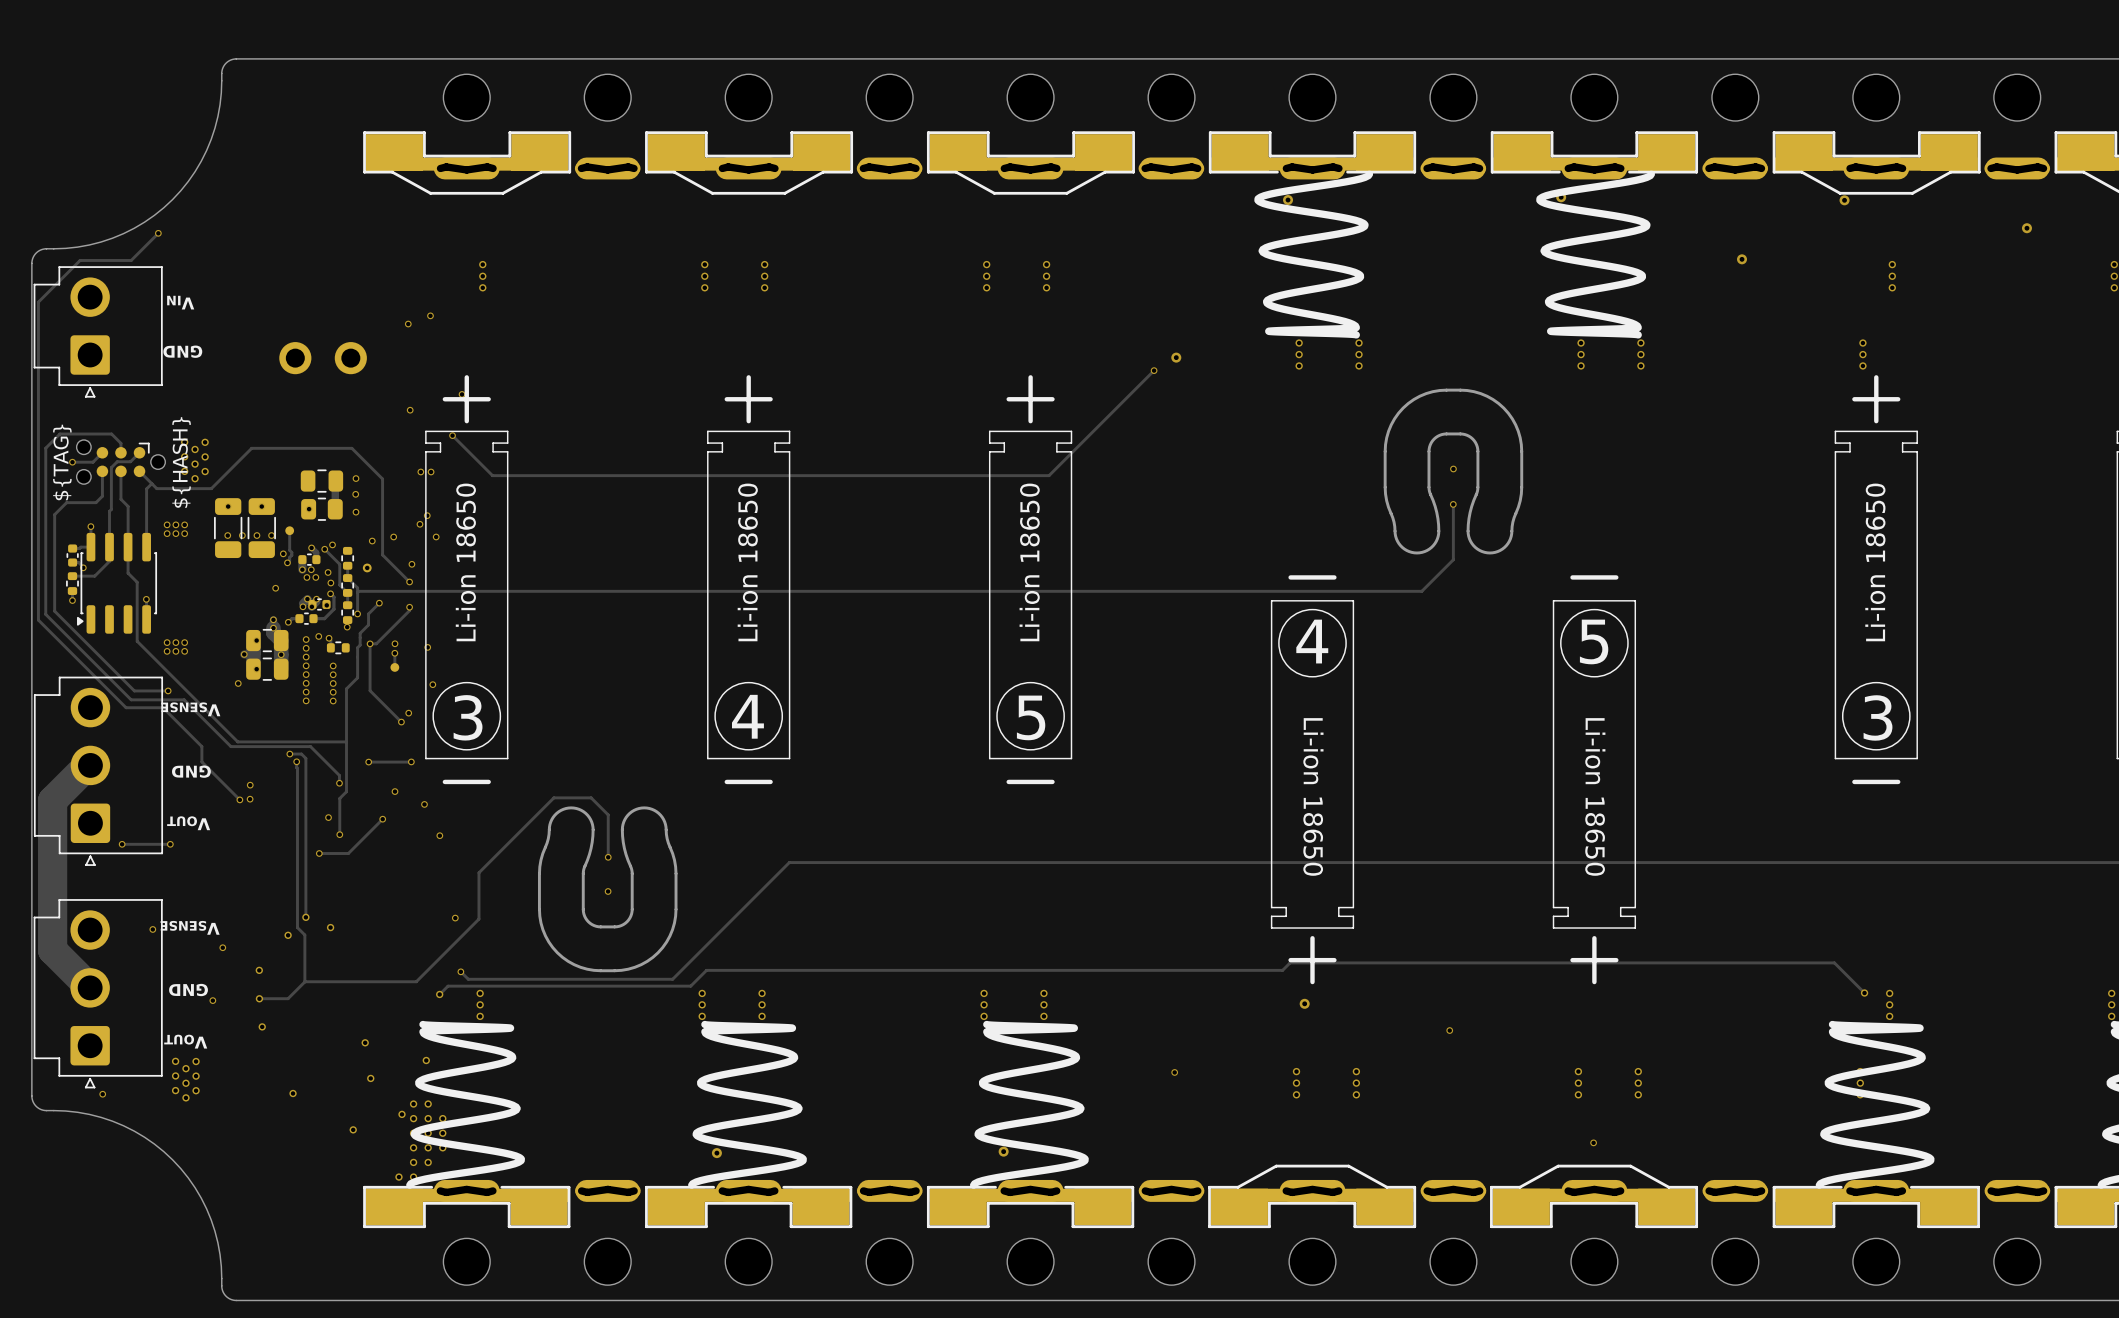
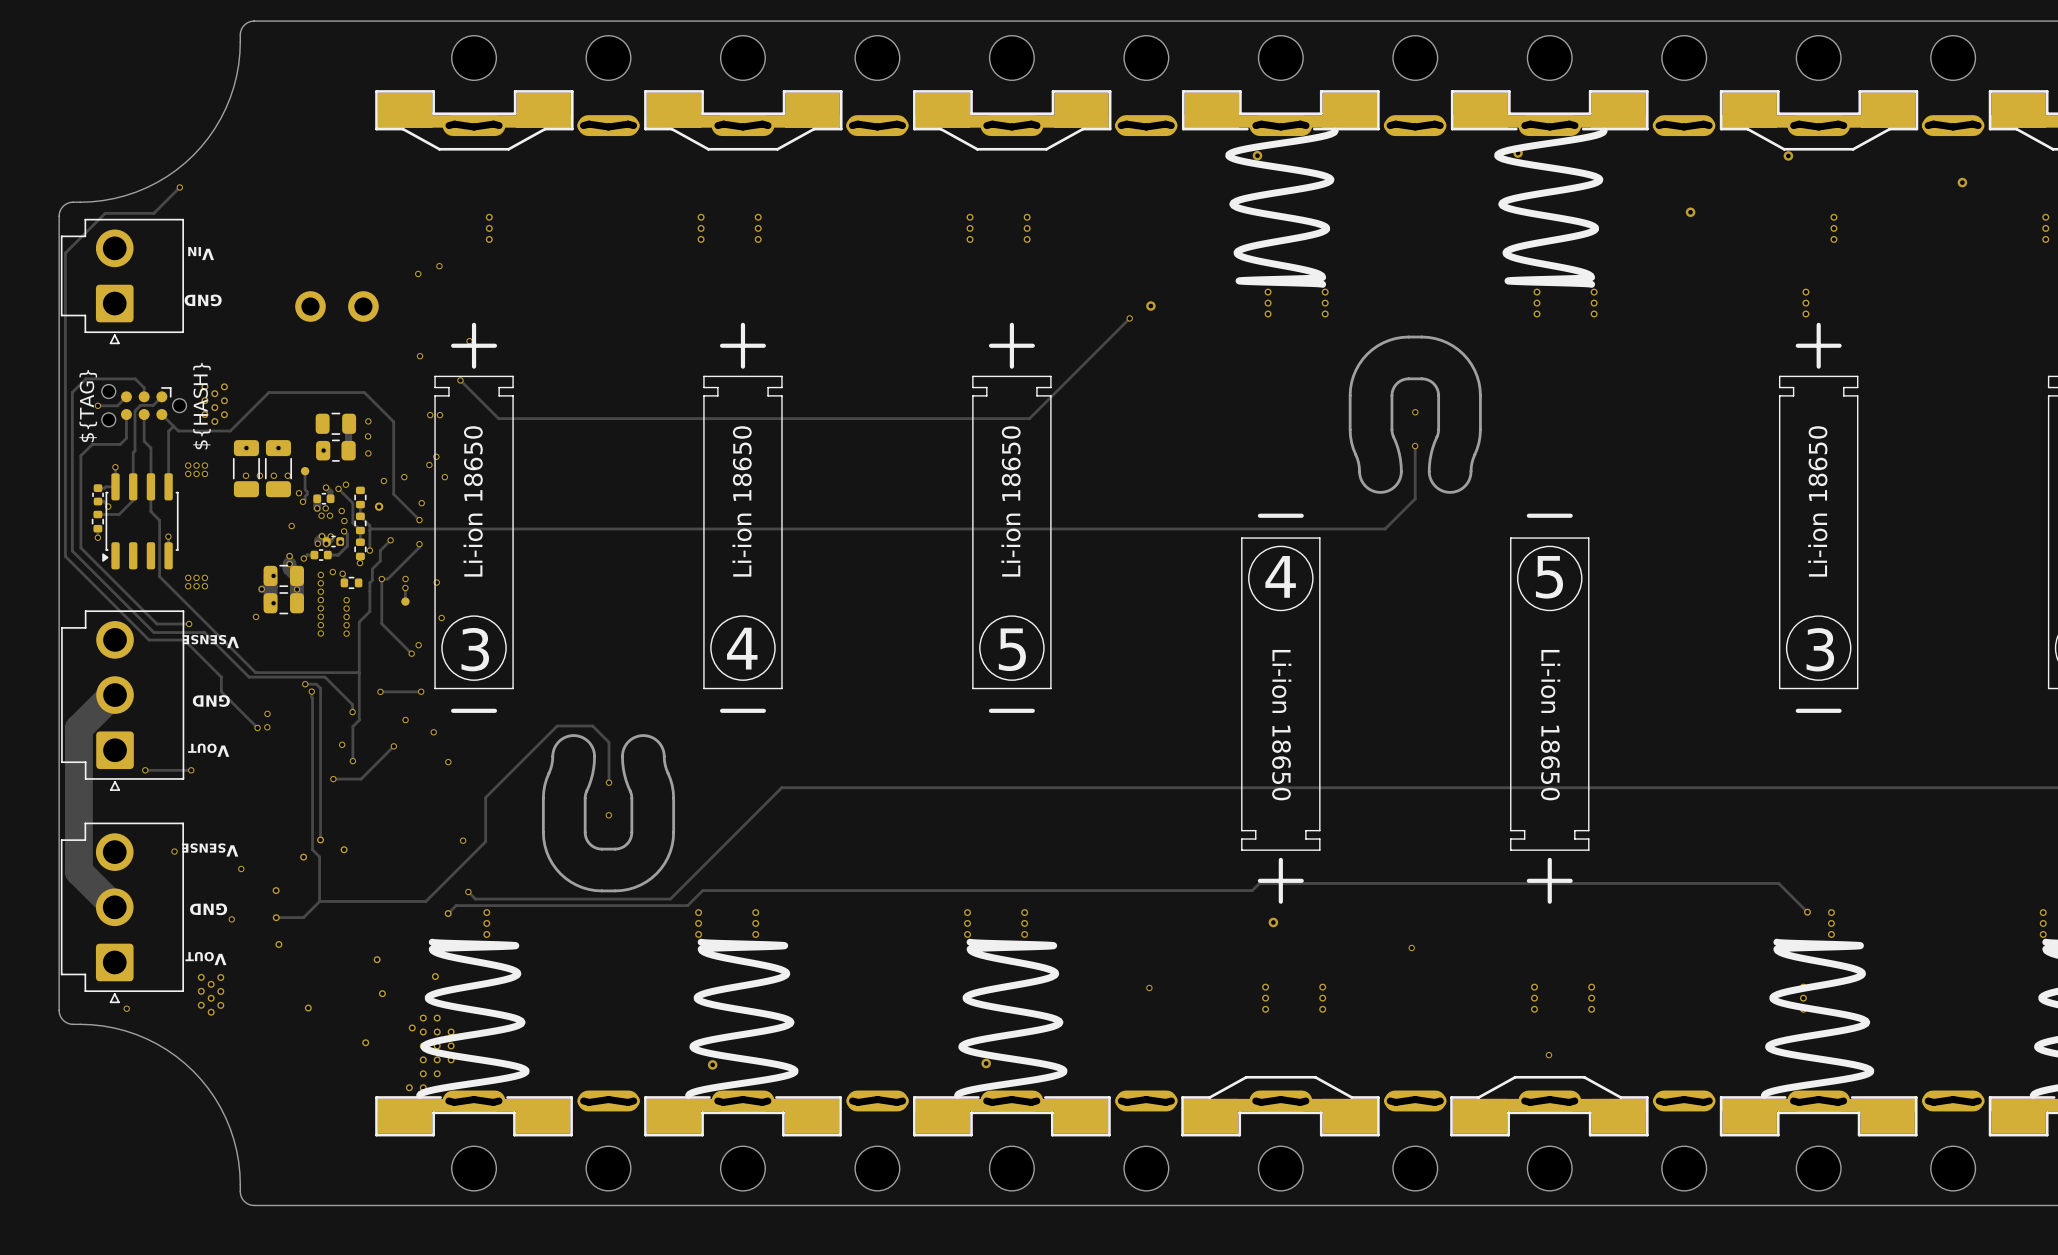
via: (175, 1061) -> none
via: none -> (201, 977)
via: (196, 1061) -> none
via: none -> (220, 977)
via: (185, 1068) -> none
via: none -> (211, 984)
via: (175, 1075) -> none
via: none -> (201, 991)
via: (196, 1076) -> none
via: none -> (220, 991)
via: (185, 1083) -> none
via: none -> (211, 998)
via: (175, 1090) -> none
via: none -> (201, 1005)
via: (196, 1090) -> none
via: none -> (220, 1005)
via: (185, 1097) -> none
via: none -> (211, 1012)

